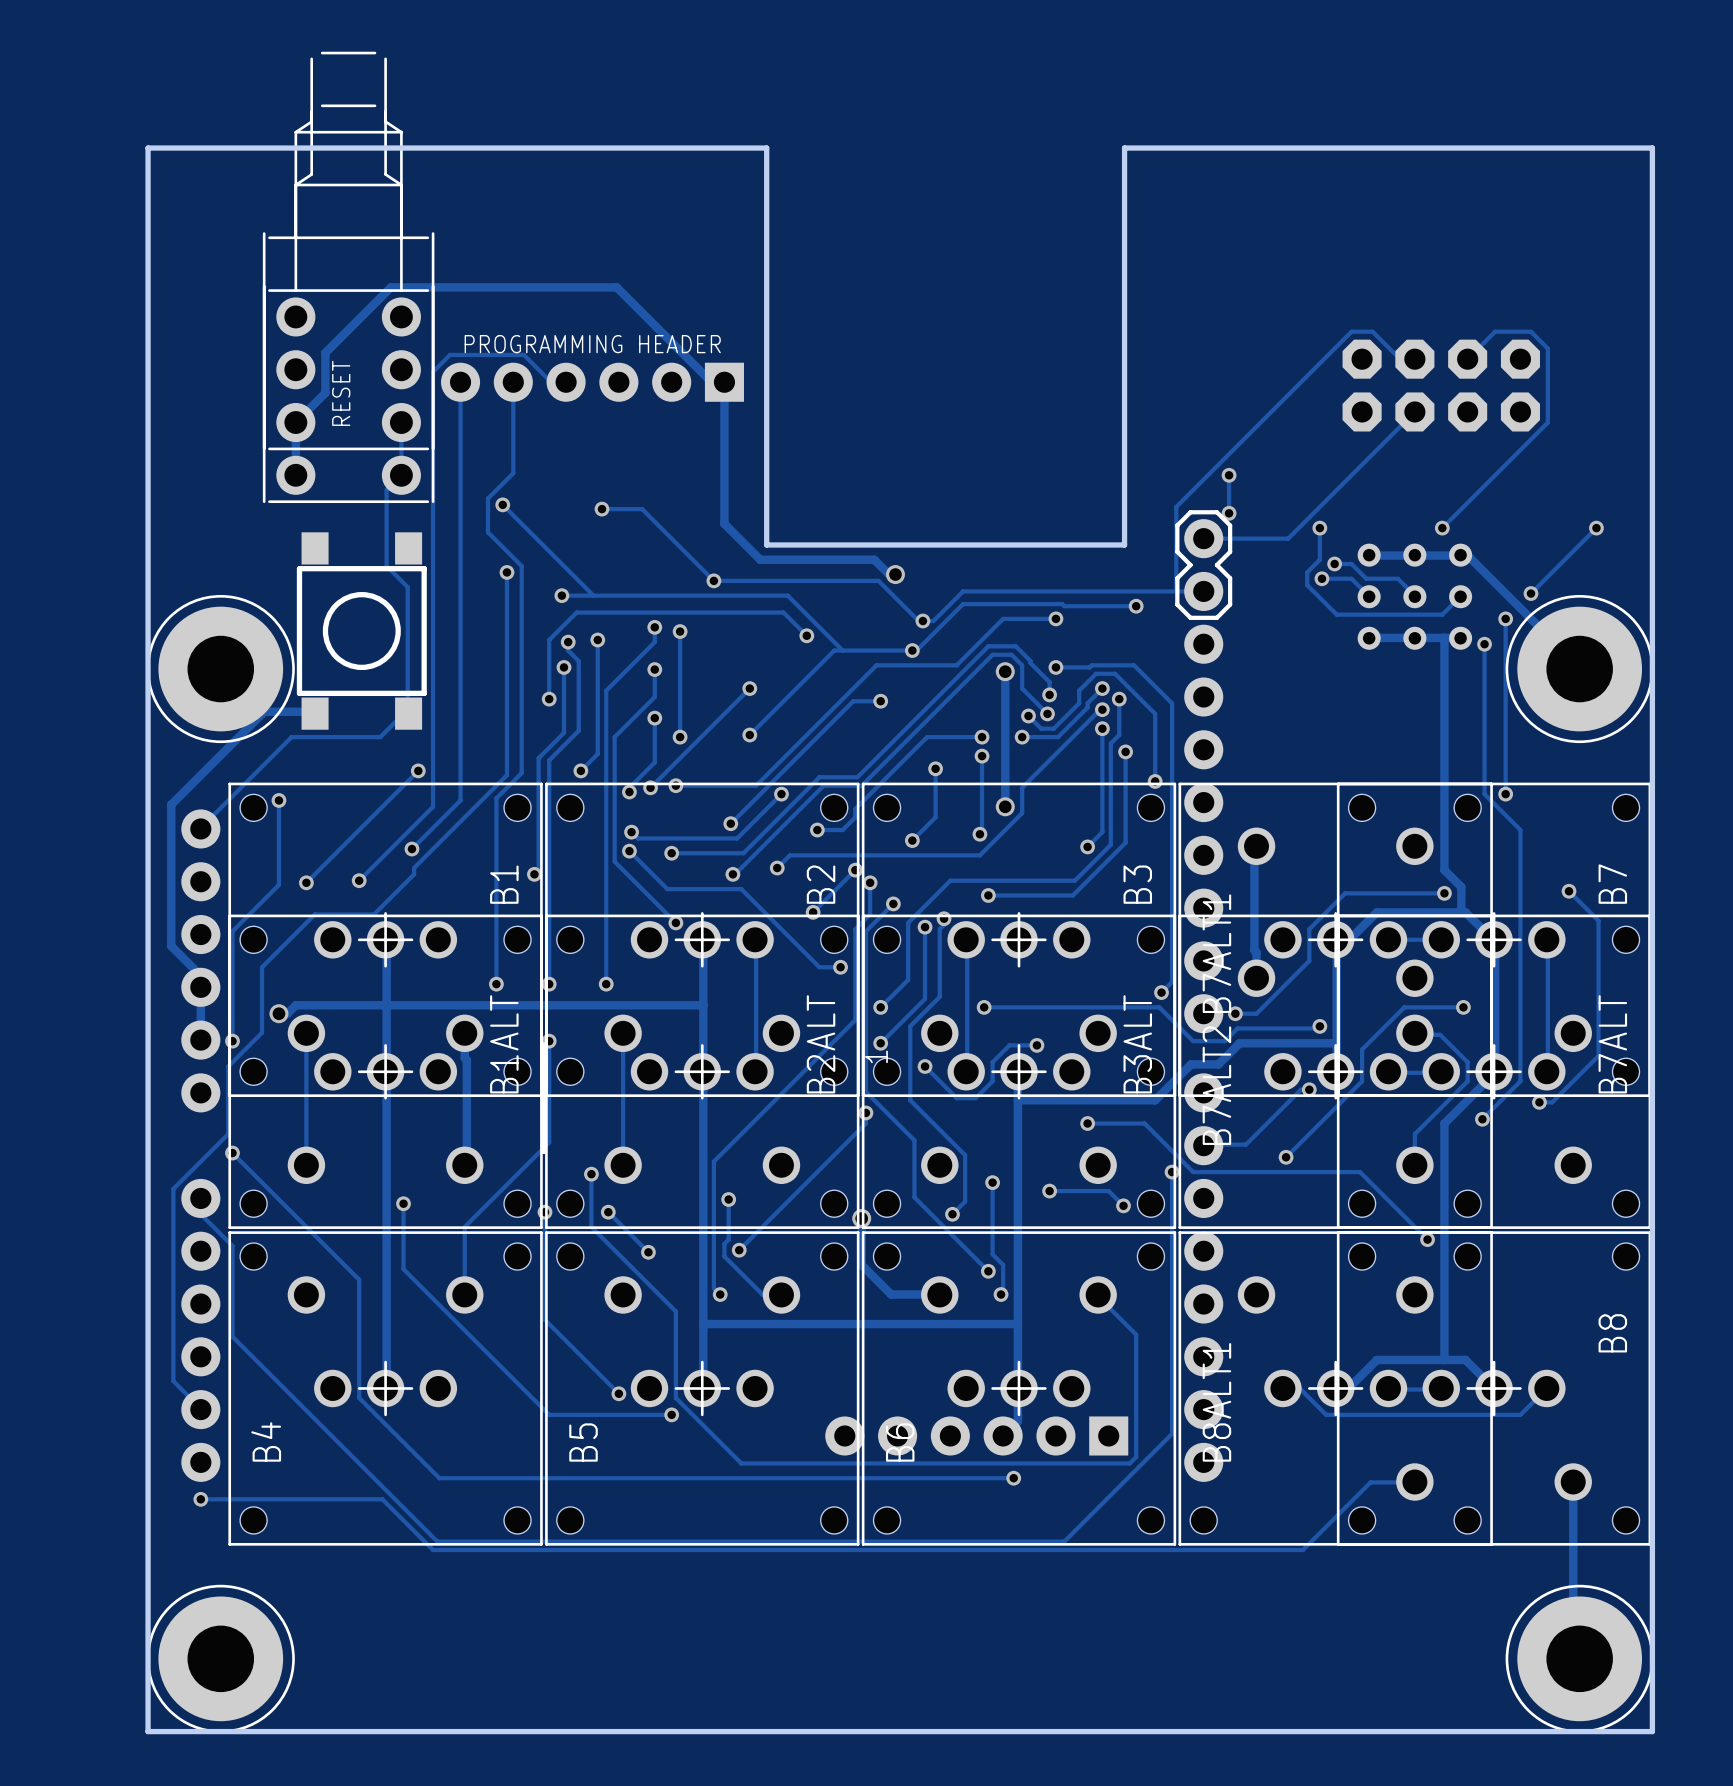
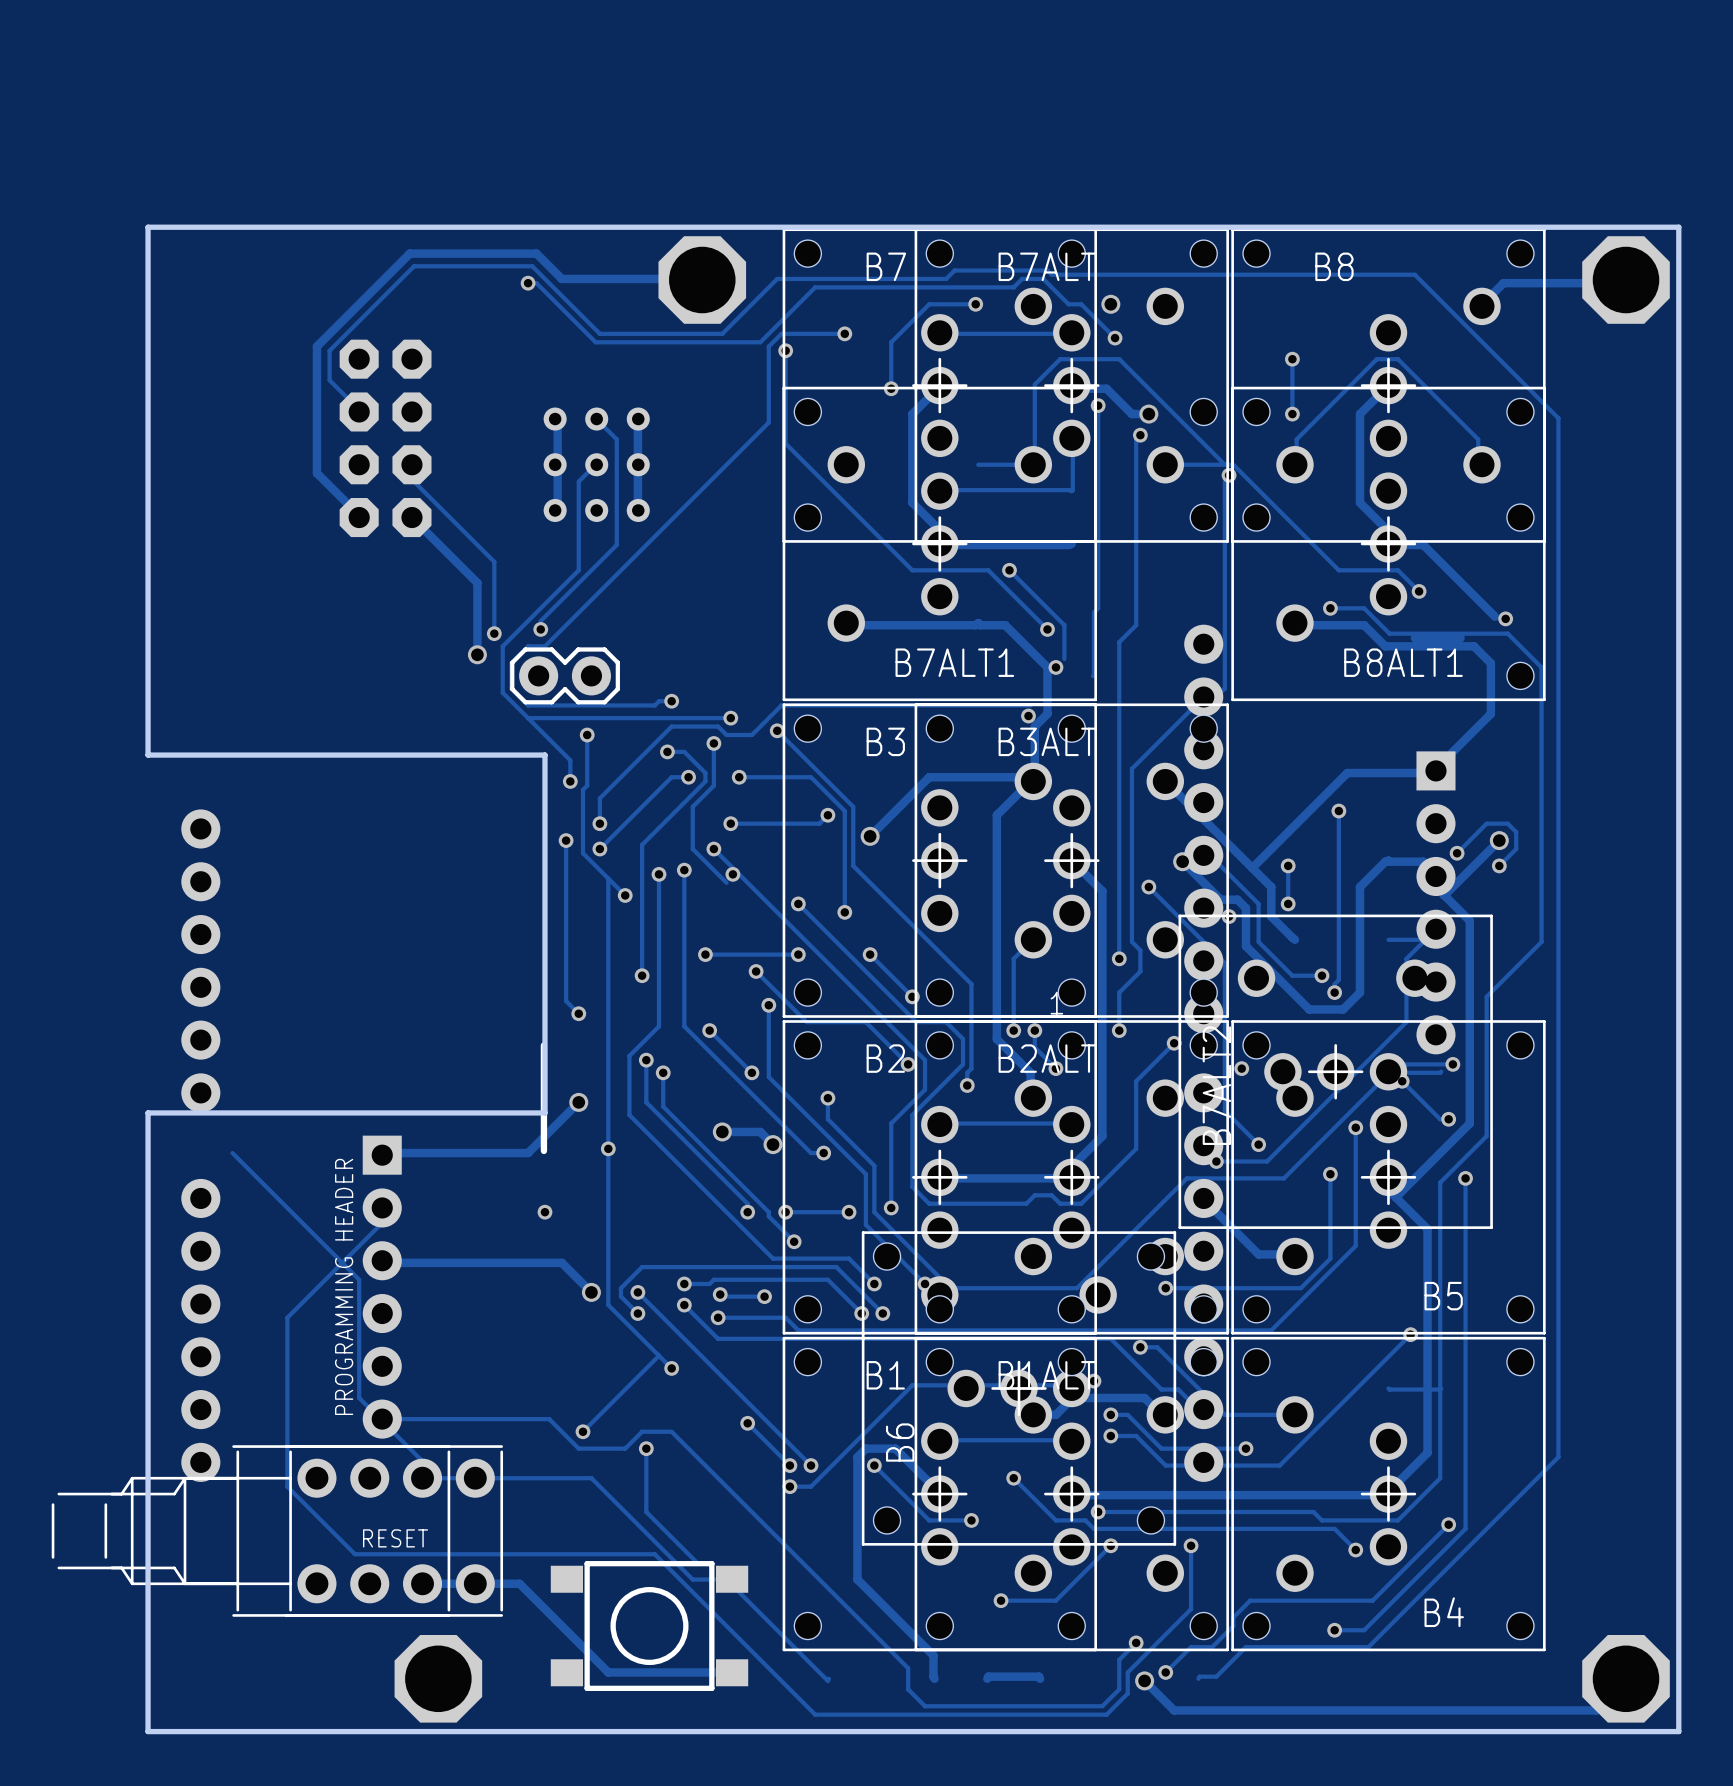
board edge: (148, 227) (148, 148) (766, 148) (766, 544) (1124, 544) (1124, 148) (1652, 148) (1652, 1731) -> (148, 227) (1678, 227) (1678, 1731) (1652, 1731)
part: (348, 250) -> none
hole: none -> (807, 253)
hole: none -> (939, 253)
hole: none -> (1071, 253)
hole: none -> (1203, 253)
track: none -> (702, 280) (561, 278) (536, 253) (409, 253) (316, 346) (316, 473) (359, 517)
part: none -> (702, 280)
track: none -> (1626, 280) (1626, 283) (1503, 283) (1482, 306)
part: none -> (1626, 280)
track: none -> (528, 283) (536, 283) (595, 342) (760, 342) (815, 287) (1013, 287) (1022, 278) (1043, 278) (1068, 304) (1081, 304) (1115, 338)
via: none -> (528, 283)
part: (348, 303) -> none
track: none -> (975, 304) (929, 304) (891, 342) (891, 388)
via: none -> (975, 304)
via: none -> (1110, 304)
track: none -> (939, 332) (1071, 332)
track: none -> (844, 333) (781, 333) (768, 346) (768, 422) (544, 646) (528, 646) (511, 663) (511, 688) (528, 705) (654, 705) (659, 701) (671, 701)
via: none -> (844, 333)
via: none -> (1115, 338)
text: PROGRAMMING HEADER (592, 344) -> none
track: none -> (785, 350) (785, 443) (912, 570) (988, 570) (1047, 629)
via: none -> (785, 350)
track: none -> (1292, 359) (1292, 414)
via: none -> (1292, 359)
track: (1414, 359) (1400, 359) (1372, 331) (1351, 331) (1176, 506) (1176, 591) -> none
track: (1467, 359) (1495, 331) (1531, 331) (1547, 348) (1547, 422) (1442, 528) -> none
track: (460, 382) (460, 800) (411, 849) -> none
track: (513, 382) (513, 473) (487, 498) (487, 532) (521, 566) (521, 773) (496, 798) (496, 984) -> none
track: (566, 382) (566, 380) (549, 380) (523, 354) (449, 354) (433, 371) (433, 806) (359, 880) -> none
part: (592, 382) -> none
track: none -> (939, 385) (912, 414) (912, 502) (937, 528) (937, 540) (939, 543) (1071, 543)
track: none -> (1071, 385) (1072, 388) (1106, 388) (1131, 414) (1148, 414)
track: none -> (1388, 385) (1359, 414) (1359, 502) (1385, 528) (1385, 540) (1389, 544) (1423, 544) (1495, 616)
part: (1441, 385) -> none
via: none -> (891, 388)
text: RESET (341, 393) -> none
track: none -> (1098, 405) (1098, 608) (1093, 612) (1092, 675)
via: none -> (1098, 405)
track: none -> (359, 411) (329, 380) (329, 350) (414, 266) (532, 266) (599, 333) (722, 333) (777, 278) (946, 278) (954, 270) (1047, 270) (1051, 274) (1414, 274) (1558, 418) (1558, 1457) (1368, 1647) (1245, 1647) (1216, 1676) (1199, 1676) (1198, 1678)
hole: none -> (807, 411)
hole: none -> (1203, 411)
hole: none -> (1256, 411)
track: (1414, 411) (1288, 538) (1203, 538) -> none
hole: none -> (1520, 411)
via: none -> (1148, 414)
via: none -> (1292, 414)
track: none -> (555, 419) (557, 422) (557, 506) (555, 510)
track: none -> (596, 419) (616, 439) (616, 544) (540, 620) (540, 629)
track: none -> (638, 419) (638, 510)
track: (401, 422) (401, 475) (386, 490) (386, 566) (407, 587) (408, 713) (405, 711) (380, 737) (291, 737) (200, 828) -> none
track: none -> (1140, 435) (1136, 439) (1136, 625) (1119, 642) (1119, 699)
via: none -> (1140, 435)
part: none -> (385, 438)
track: none -> (1071, 438) (1071, 491) (939, 491)
track: none -> (411, 464) (414, 464) (414, 481) (494, 561) (494, 633)
track: none -> (596, 464) (578, 481) (578, 570) (502, 646) (502, 692) (570, 760) (570, 781)
part: none -> (596, 464)
track: none -> (978, 464) (1034, 464) (1034, 384) (1060, 359) (1119, 359) (1224, 464)
track: none -> (1165, 464) (1233, 464) (1338, 570) (1397, 570) (1419, 591)
track: none -> (1294, 464) (1296, 464) (1296, 439) (1376, 359) (1397, 359) (1478, 439) (1478, 464) (1482, 464)
track: (295, 475) (295, 422) (325, 392) (325, 352) (390, 287) (616, 287) (709, 380) (722, 380) (724, 382) (724, 523) (760, 559) (874, 559) (889, 574) (895, 574) -> none
track: (1229, 475) (1229, 513) -> (1288, 865) (1288, 903)
track: none -> (1224, 481) (1224, 688) (1207, 705) (1195, 705) (1131, 768) (1131, 941) (1140, 950) (1140, 971) (1119, 992) (1119, 1030)
track: (502, 504) (593, 595) -> none
via: (502, 504) -> none
track: (601, 509) (642, 509) (713, 580) (878, 580) (918, 620) (933, 620) (963, 591) (1203, 591) -> none
via: (601, 509) -> none
via: (1229, 513) -> none
track: none -> (411, 517) (477, 582) (477, 654)
hole: none -> (807, 517)
hole: none -> (1203, 517)
track: (1319, 528) (1319, 559) (1307, 572) (1307, 585) (1336, 614) (1442, 614) (1460, 596) -> none
via: (1319, 528) -> none
via: (1442, 528) -> none
track: (1596, 528) (1531, 593) -> none
via: (1596, 528) -> none
track: (1369, 555) (1414, 555) -> none
track: (1414, 555) (1460, 555) (1463, 557) (1469, 557) (1579, 669) -> none
track: (1334, 563) (1351, 563) (1366, 578) (1397, 578) (1414, 596) -> none
via: (1334, 563) -> none
part: (1203, 565) -> none
track: none -> (1009, 570) (1064, 625) (1064, 659)
via: none -> (1009, 570)
track: (506, 572) (506, 775) (414, 868) (414, 874) (373, 914) (314, 914) (262, 967) (262, 1032) (228, 1066) (228, 1134) (173, 1188) (173, 1381) (200, 1409) -> none
via: (506, 572) -> none
via: (895, 574) -> none
track: (1321, 578) (1351, 578) (1369, 596) -> none
via: (1321, 578) -> none
via: (713, 580) -> none
via: none -> (1419, 591)
via: (1531, 593) -> none
track: (561, 595) (787, 595) (842, 650) -> none
via: (561, 595) -> none
part: (1414, 596) -> none
track: (1136, 606) (963, 604) (916, 650) (834, 650) (749, 735) -> none
via: (1136, 606) -> none
track: none -> (1330, 608) (1364, 608) (1389, 633) (1507, 633) (1541, 667) (1541, 941) (1486, 996) (1486, 1136) (1440, 1182) (1440, 1478) (1397, 1520) (1321, 1520) (1313, 1512) (1098, 1512)
via: none -> (1330, 608)
track: (1055, 618) (1003, 618) (956, 665) (876, 665) (756, 785) (675, 785) -> none
via position: (1055, 618) -> (1047, 629)
track: (1505, 618) (1505, 794) -> none
via: (922, 620) -> none
track: none -> (846, 623) (849, 625) (975, 625) (978, 623) (979, 625) (1005, 625) (1047, 667) (1047, 713) (1034, 726) (1034, 781) (1030, 781) (996, 815) (996, 1039) (1030, 1072) (1030, 1098) (1033, 1098)
track: none -> (1294, 623) (1296, 625) (1364, 625) (1385, 646) (1473, 646) (1490, 663) (1490, 713) (1435, 768) (1435, 773) (1347, 773) (1252, 868)
track: (654, 627) (654, 642) (606, 690) (606, 984) -> none
via: (654, 627) -> none
via: none -> (540, 629)
part: (361, 631) -> none
track: (680, 631) (680, 737) -> none
via: (680, 631) -> none
via: none -> (494, 633)
track: (806, 635) (783, 612) (576, 612) (549, 640) (549, 699) -> none
via: (806, 635) -> none
track: (1414, 637) (1369, 638) -> none
track: (1444, 637) (1444, 870) (1461, 887) (1461, 912) -> none
track: (597, 640) (597, 754) (580, 770) -> none
via: (597, 640) -> none
track: (568, 642) (568, 650) (578, 661) (578, 730) (549, 760) (549, 984) -> none
via: (568, 642) -> none
track: (1484, 644) (1484, 794) (1520, 830) (1520, 1081) (1482, 1119) -> none
via: (1484, 644) -> none
via: (912, 650) -> none
via: none -> (477, 654)
track: (563, 667) (563, 732) (538, 758) (538, 870) (534, 874) -> none
via: (563, 667) -> none
track: (1055, 667) (1134, 665) (1172, 703) (1172, 982) (1161, 992) -> none
part: (220, 669) -> none
track: (654, 669) (654, 697) (614, 737) (614, 861) (675, 922) -> none
via: (654, 669) -> none
part: (1579, 669) -> none
track: (1005, 671) (1005, 806) -> none
via: (1005, 671) -> none
part: none -> (565, 675)
hole: none -> (1520, 675)
track: (749, 688) (650, 787) -> none
via: (749, 688) -> none
track: (1102, 688) (1087, 703) (1087, 707) (1058, 737) (1022, 737) -> none
via: (1102, 688) -> none
track: (1049, 694) (1049, 682) (1015, 646) (988, 646) (857, 777) (819, 777) (743, 853) (671, 853) -> none
via: (1049, 694) -> none
via: (549, 699) -> none
via: (1119, 699) -> none
via: none -> (671, 701)
track: (880, 701) (853, 701) (730, 823) -> (827, 815) (819, 823) (730, 823)
via: (880, 701) -> none
track: none -> (1030, 705) (781, 705) (751, 735) (726, 735) (718, 726) (671, 726) (599, 798) (599, 823)
track: (1102, 709) (1022, 787) (1022, 813) (979, 855) (789, 855) (777, 868) -> none
via: (1102, 709) -> none
track: (315, 713) (314, 711) (264, 711) (220, 669) (262, 713) (171, 804) (171, 946) (198, 973) (198, 984) (200, 987) (200, 1040) -> none
track: (1047, 713) (1022, 688) (1022, 665) (1011, 654) (992, 654) (861, 785) (823, 785) (732, 874) -> none
via: (1047, 713) -> none
track: (1028, 716) (1041, 728) (1053, 728) (1079, 703) (1079, 690) (1096, 673) (1115, 673) (1155, 713) (1155, 781) -> none
track: none -> (528, 718) (730, 718)
track: (654, 718) (654, 762) (629, 787) (629, 792) -> none
via: (654, 718) -> none
via: none -> (730, 718)
track: (1102, 728) (1102, 832) (1087, 846) -> none
via: (1102, 728) -> none
track: none -> (777, 730) (853, 806) (853, 865) (971, 984) (971, 1068) (967, 1072) (967, 1085)
via: none -> (777, 730)
track: none -> (587, 735) (587, 785) (582, 789) (582, 853) (625, 895)
via: none -> (587, 735)
via: (749, 735) -> none
track: (1119, 735) (1110, 743) (1110, 844) (1074, 880) (950, 880) (908, 922) (908, 979) (880, 1007) -> (1119, 735) (1119, 958)
via position: (680, 737) -> (667, 751)
track: (982, 737) (927, 737) (855, 808) (855, 817) (842, 830) (817, 830) -> none
via: (982, 737) -> none
via: (1022, 737) -> none
track: none -> (713, 743) (713, 785) (692, 806) (692, 849) (726, 882)
via: none -> (713, 743)
track: none -> (667, 751) (684, 751) (705, 773) (705, 781) (642, 844) (642, 975)
track: (1125, 751) (1125, 842) (1072, 895) (988, 895) -> none
via: (1125, 751) -> none
board edge: (148, 755) (148, 1112) -> (148, 755) (544, 755) (544, 1112) (148, 1112)
track: (982, 756) (982, 832) (979, 834) -> none
via: (982, 756) -> none
track: (935, 768) (935, 817) (912, 840) -> none
via: (935, 768) -> none
track: (418, 770) (306, 882) -> none
via: (418, 770) -> none
via position: (580, 770) -> (570, 781)
track: none -> (688, 777) (671, 777) (599, 849)
track: none -> (739, 777) (811, 777) (844, 811) (844, 912)
via: none -> (739, 777)
track: none -> (1033, 781) (1034, 777) (929, 777) (870, 836)
via: (1155, 781) -> none
track: none -> (1165, 781) (1271, 887) (1271, 916) (1294, 939)
via position: (675, 785) -> (688, 777)
via: (650, 787) -> none
via: (629, 792) -> none
track: (781, 794) (737, 838) (637, 838) (631, 832) -> none
via: (781, 794) -> none
via: (1505, 794) -> none
track: (278, 800) (278, 884) (232, 931) (232, 1041) -> none
via: (278, 800) -> none
via: (1005, 806) -> none
hole: (1362, 807) -> none
hole: (1467, 807) -> none
hole: (1626, 807) -> none
track: none -> (1338, 811) (1338, 979) (1334, 984) (1334, 992)
via: none -> (1338, 811)
via: none -> (599, 823)
via position: (817, 830) -> (827, 815)
via: (631, 832) -> none
via: (979, 834) -> none
via: none -> (870, 836)
track: none -> (566, 840) (566, 1001) (578, 1013)
via: none -> (566, 840)
via: (912, 840) -> none
track: none -> (1499, 840) (1444, 895) (1435, 876)
via: none -> (1499, 840)
via: (1087, 846) -> none
track: (1256, 846) (1254, 849) (1254, 950) (1256, 952) (1256, 978) -> none
via: (411, 849) -> none
via: none -> (599, 849)
track: none -> (713, 849) (925, 1060) (925, 1089) (891, 1123) (891, 1207)
via: none -> (713, 849)
track: (629, 851) (667, 889) (741, 889) (819, 967) (840, 967) -> none
via: (629, 851) -> none
via: (671, 853) -> none
track: none -> (1457, 853) (1486, 823) (1507, 823) (1516, 832) (1516, 849) (1499, 865)
via: none -> (1457, 853)
track: none -> (1071, 860) (1102, 891) (1102, 1136) (1072, 1165) (1071, 1177) (1068, 1178) (939, 1177)
track: none -> (1182, 861) (1220, 899) (1237, 899) (1245, 908) (1245, 946) (1309, 1009) (1343, 1009) (1359, 992) (1359, 887) (1385, 861) (1423, 861) (1435, 874) (1435, 887) (1469, 920) (1469, 1123) (1395, 1197)
via: none -> (1182, 861)
track: none -> (1212, 865) (1220, 865) (1258, 903) (1258, 941) (1292, 975) (1321, 975)
via: none -> (1288, 865)
via: none -> (1499, 865)
via: (777, 868) -> none
track: none -> (684, 870) (684, 1026) (811, 1153) (823, 1153)
via: none -> (684, 870)
track: (855, 870) (813, 912) -> none
via: (855, 870) -> none
via: (534, 874) -> none
track: none -> (659, 874) (659, 1026) (629, 1055) (629, 1115) (773, 1258) (849, 1258) (874, 1283)
via: none -> (659, 874)
track: none -> (608, 878) (608, 1305) (671, 1368)
via: (359, 880) -> none
via: (306, 882) -> none
track: (870, 882) (870, 914) (855, 929) (855, 1020) (713, 1161) (713, 1288) (720, 1294) -> none
via: (870, 882) -> none
track: none -> (1148, 887) (1224, 963) (1224, 1110) (1258, 1144)
via: none -> (1148, 887)
track: (1569, 891) (1598, 920) (1598, 1055) (1552, 1102) (1539, 1102) -> none
via: (1569, 891) -> none
track: (1444, 893) (1345, 893) (1309, 929) (1309, 960) (1256, 1013) (1235, 1013) -> none
via: (1444, 893) -> none
via: none -> (625, 895)
via: (988, 895) -> none
part: none -> (1435, 902)
track: none -> (798, 903) (916, 1022) (946, 1022) (963, 1039) (963, 1064) (912, 1115) (912, 1186) (929, 1203) (1026, 1203) (1034, 1195) (1051, 1195) (1060, 1203) (1081, 1203) (1136, 1148) (1136, 1081) (1174, 1043)
track: (893, 903) (865, 931) (865, 1091) (914, 1140) (914, 1197) (988, 1271) -> none
via: (893, 903) -> none
via: none -> (1288, 903)
via position: (813, 912) -> (798, 903)
via: none -> (844, 912)
via: none -> (1229, 916)
track: (944, 918) (944, 925) (939, 929) (939, 996) (910, 1026) (910, 1100) (965, 1155) (965, 1201) (952, 1214) -> none
via: (944, 918) -> none
via: (675, 922) -> none
track: (925, 927) (925, 998) (880, 1043) -> none
via: (925, 927) -> none
track: none -> (1435, 929) (1406, 958) (1406, 1022) (1267, 1161) (1216, 1161)
track: (385, 939) (385, 1388) -> none
B1 rotation: 0° (385, 939) -> 90° counterclockwise (939, 1494)
B1 position: (385, 939) -> (939, 1494)
track: (702, 939) (702, 1388) -> none
B2 rotation: 0° (702, 939) -> 90° counterclockwise (939, 1177)
B2 position: (702, 939) -> (939, 1177)
track: (755, 939) (755, 1071) -> none
track: (966, 939) (966, 1071) -> none
B3 rotation: 0° (1018, 939) -> 90° counterclockwise (939, 860)
track: none -> (1033, 939) (1013, 958) (1013, 1030)
B7ALT1 rotation: 0° (1335, 939) -> 90° counterclockwise (939, 543)
B7ALT1 position: (1335, 939) -> (939, 543)
B7 rotation: 0° (1494, 939) -> 90° counterclockwise (939, 385)
B7 position: (1494, 939) -> (939, 385)
track: (1546, 939) (1546, 1071) -> none
hole: (1626, 939) -> none
track: none -> (705, 954) (798, 954)
via: none -> (705, 954)
via: none -> (798, 954)
track: none -> (870, 954) (912, 996)
via: none -> (870, 954)
via: none -> (1119, 958)
via: (840, 967) -> none
track: none -> (756, 971) (806, 1022) (865, 1022) (908, 1064)
via: none -> (756, 971)
via: none -> (642, 975)
via: none -> (1321, 975)
via: (496, 984) -> none
via: (549, 984) -> none
via: (606, 984) -> none
via: (1161, 992) -> none
via: none -> (1334, 992)
via: none -> (912, 996)
track: (703, 1005) (295, 1005) (287, 1013) (278, 1013) -> none
track: none -> (768, 1005) (768, 1077) (865, 1174) (865, 1224) (925, 1283)
via: none -> (768, 1005)
via: (880, 1007) -> none
track: (984, 1007) (1159, 1007) (1193, 1041) (1224, 1041) (1237, 1028) (1317, 1028) (1319, 1026) -> none
via: (984, 1007) -> none
track: (1463, 1007) (1404, 1007) (1362, 1049) (1362, 1081) (1286, 1157) -> none
via: (1463, 1007) -> none
via: (278, 1013) -> none
via: none -> (578, 1013)
via: (1235, 1013) -> none
via: (1319, 1026) -> none
track: none -> (709, 1030) (751, 1072)
via: none -> (709, 1030)
via: none -> (1013, 1030)
track: none -> (1034, 1030) (1034, 1047) (1055, 1068)
via: none -> (1119, 1030)
track: (306, 1033) (306, 1165) -> none
track: (464, 1033) (464, 1058) (466, 1060) (466, 1161) (464, 1165) -> none
track: (623, 1033) (623, 1165) -> none
track: (1414, 1033) (1440, 1034) (1467, 1062) (1467, 1081) (1414, 1134) (1414, 1165) -> none
via: (232, 1041) -> none
track: (549, 1041) (549, 1142) (464, 1226) (464, 1294) -> none
via: (549, 1041) -> none
via: (880, 1043) -> none
via: none -> (1174, 1043)
track: (1336, 1043) (1239, 1043) (1218, 1064) (1191, 1064) (1155, 1100) (1017, 1100) -> none
track: (1036, 1045) (1009, 1045) (992, 1062) (992, 1081) (975, 1098) (956, 1098) (925, 1066) -> none
via position: (1036, 1045) -> (1034, 1030)
text rotation: 0° (876, 1056) -> 90° clockwise (1056, 1003)
text position: 1 (876, 1056) -> 1 (1056, 1003)
track: none -> (646, 1060) (646, 1102) (747, 1203) (747, 1212)
via: none -> (646, 1060)
track: none -> (1452, 1064) (1397, 1064) (1283, 1178) (1186, 1178) (1077, 1288) (950, 1288) (874, 1212) (874, 1165) (827, 1119) (827, 1098)
via: none -> (1452, 1064)
via position: (925, 1066) -> (908, 1064)
via: none -> (1055, 1068)
via: none -> (1241, 1068)
B1ALT rotation: 0° (385, 1071) -> 90° counterclockwise (1071, 1494)
B1ALT position: (385, 1071) -> (1071, 1494)
B2ALT rotation: 0° (702, 1071) -> 90° counterclockwise (1071, 1177)
B2ALT position: (702, 1071) -> (1071, 1177)
track: (1018, 1071) (1017, 1421) (1003, 1435) -> none
B3ALT rotation: 0° (1018, 1071) -> 90° counterclockwise (1071, 860)
B3ALT position: (1018, 1071) -> (1071, 860)
track: (1335, 1071) (1335, 939) (1338, 937) (1351, 937) (1376, 912) (1465, 912) (1495, 939) (1495, 1070) (1444, 1123) (1444, 1359) -> none
B7ALT rotation: 0° (1494, 1071) -> 90° counterclockwise (1071, 385)
B7ALT position: (1494, 1071) -> (1071, 385)
hole: (1626, 1071) -> none
track: none -> (663, 1072) (663, 1106) (768, 1212) (768, 1216) (794, 1241)
via: none -> (663, 1072)
via: none -> (751, 1072)
track: none -> (1402, 1081) (1440, 1119) (1448, 1119)
via: none -> (1402, 1081)
via: none -> (967, 1085)
track: (1309, 1089) (1300, 1089) (1245, 1144) (1203, 1145) -> none
via: (1309, 1089) -> none
via: none -> (827, 1098)
track: none -> (578, 1102) (528, 1153) (384, 1153) (382, 1155)
via: none -> (578, 1102)
via: (1539, 1102) -> none
track: (865, 1112) (865, 1123) (739, 1250) -> none
via: (865, 1112) -> none
via: none -> (1448, 1119)
via: (1482, 1119) -> none
track: (1087, 1123) (1144, 1123) (1193, 1172) (1359, 1172) (1427, 1239) -> none
via: (1087, 1123) -> none
track: none -> (939, 1124) (1071, 1124)
track: none -> (1355, 1127) (1355, 1245) (1271, 1330) (798, 1330) (785, 1317) (718, 1317)
via: none -> (1355, 1127)
track: none -> (722, 1131) (760, 1131) (773, 1144)
via: none -> (722, 1131)
via: none -> (773, 1144)
via: none -> (1258, 1144)
via: (232, 1153) -> none
via: none -> (823, 1153)
via: (1286, 1157) -> none
via: none -> (1216, 1161)
track: (1172, 1172) (1172, 1433) (1064, 1541) (437, 1541) (232, 1336) (232, 1245) (200, 1214) (200, 1198) -> none
via: (1172, 1172) -> none
track: (591, 1174) (591, 1226) (675, 1311) (675, 1397) (741, 1463) (1129, 1463) (1136, 1457) (1136, 1334) (1098, 1294) -> none
via position: (591, 1174) -> (608, 1148)
track: none -> (1330, 1174) (1330, 1258) (1300, 1288) (1165, 1288)
via: none -> (1330, 1174)
track: none -> (1388, 1177) (1389, 1191) (1427, 1229) (1427, 1452) (1388, 1494) (1071, 1494)
track: none -> (1465, 1178) (1465, 1528) (1364, 1630) (1334, 1630)
via: none -> (1465, 1178)
track: (992, 1182) (992, 1254) (1003, 1264) (1003, 1292) (1001, 1294) -> none
via: (992, 1182) -> none
track: (1049, 1191) (1108, 1191) (1123, 1205) -> none
via: (1049, 1191) -> none
track: none -> (1199, 1195) (1258, 1254) (1292, 1254) (1294, 1256)
track: (728, 1199) (728, 1239) (724, 1243) (724, 1256) (762, 1294) (781, 1294) -> none
via: (728, 1199) -> none
track: (403, 1203) (403, 1269) (549, 1414) (671, 1414) -> none
via: (403, 1203) -> none
hole: (1362, 1203) -> none
hole: (1467, 1203) -> none
hole: (1626, 1203) -> none
via: (1123, 1205) -> none
track: none -> (382, 1207) (380, 1207) (380, 1224) (287, 1317) (287, 1486) (354, 1554) (654, 1554) (815, 1714) (1106, 1714) (1127, 1693) (1127, 1672) (1191, 1609) (1191, 1545)
via: none -> (891, 1207)
track: (544, 1212) (544, 1319) (618, 1393) -> none
track: (608, 1212) (648, 1252) -> none
via: (608, 1212) -> none
via: none -> (747, 1212)
track: none -> (785, 1212) (849, 1212)
via: none -> (785, 1212)
via: (952, 1214) -> none
track: (861, 1218) (861, 1264) (891, 1294) (939, 1294) -> none
via position: (861, 1218) -> (849, 1212)
via: (1427, 1239) -> none
via: none -> (794, 1241)
via: (739, 1250) -> none
via: (648, 1252) -> none
hole: (1467, 1256) -> none
track: none -> (382, 1260) (384, 1262) (561, 1262) (591, 1292)
via: (988, 1271) -> none
track: none -> (684, 1283) (709, 1283) (713, 1279) (827, 1279) (861, 1313)
via: none -> (684, 1283)
via: none -> (874, 1283)
via: none -> (925, 1283)
text: none -> PROGRAMMING HEADER (344, 1286)
part: none -> (382, 1287)
via: none -> (1165, 1288)
via: none -> (591, 1292)
track: none -> (637, 1292) (811, 1465)
via: none -> (637, 1292)
via: (1001, 1294) -> none
track: none -> (718, 1296) (764, 1296)
via: none -> (764, 1296)
track: none -> (684, 1305) (718, 1338) (1110, 1338) (1161, 1389) (1178, 1389) (1207, 1419)
via: none -> (684, 1305)
track: none -> (637, 1313) (620, 1296) (620, 1288) (642, 1267) (836, 1267) (882, 1313)
via: none -> (637, 1313)
via: none -> (861, 1313)
via: none -> (882, 1313)
via: none -> (718, 1317)
track: (703, 1324) (1017, 1324) -> none
track: none -> (1410, 1334) (1279, 1465) (1165, 1465) (1136, 1435) (1110, 1435)
via: none -> (1410, 1334)
track: none -> (1140, 1347) (1157, 1347) (1224, 1414) (1294, 1414)
via: none -> (1140, 1347)
track: none -> (659, 1355) (582, 1431)
via: none -> (671, 1368)
track: none -> (1093, 1381) (1089, 1385) (912, 1385) (811, 1486) (789, 1486)
via: none -> (1093, 1381)
B4 rotation: 0° (385, 1388) -> 90° counterclockwise (1388, 1494)
B4 position: (385, 1388) -> (1388, 1494)
B5 rotation: 0° (702, 1388) -> 90° counterclockwise (1388, 1177)
B5 position: (702, 1388) -> (1388, 1177)
track: (1282, 1388) (1300, 1389) (1326, 1414) (1520, 1414) (1546, 1388) -> none
track: (1335, 1388) (1349, 1387) (1376, 1359) (1465, 1359) (1494, 1388) -> none
B8ALT1 rotation: 0° (1335, 1388) -> 90° counterclockwise (1388, 543)
B8ALT1 position: (1335, 1388) -> (1388, 543)
B8 rotation: 0° (1494, 1388) -> 90° counterclockwise (1388, 385)
B8 position: (1494, 1388) -> (1388, 385)
via: (618, 1393) -> none
via: (671, 1414) -> none
track: none -> (1033, 1414) (1055, 1414) (1072, 1397) (1144, 1397) (1161, 1414) (1165, 1414)
track: none -> (1110, 1414) (1127, 1414) (1161, 1448) (1245, 1448)
via: none -> (1110, 1414)
track: none -> (382, 1419) (549, 1419) (578, 1448) (625, 1448) (642, 1431) (671, 1431) (908, 1668) (908, 1689) (925, 1706) (1102, 1706) (1119, 1689) (1119, 1659) (1136, 1642)
track: none -> (747, 1423) (789, 1465)
via: none -> (747, 1423)
via: none -> (582, 1431)
part: (976, 1435) -> none
via: none -> (1110, 1435)
track: none -> (939, 1441) (1071, 1441)
track: none -> (646, 1448) (646, 1512) (697, 1562)
via: none -> (646, 1448)
via: none -> (1245, 1448)
via: none -> (789, 1465)
via: none -> (811, 1465)
track: none -> (874, 1465) (929, 1520) (971, 1520)
via: none -> (874, 1465)
track: (591, 1478) (1013, 1478) -> (591, 1478) (692, 1579) (735, 1579) (735, 1588) (827, 1680) (828, 1678)
track: none -> (1013, 1478) (1055, 1520) (1085, 1520) (1093, 1528) (1334, 1528) (1355, 1550)
track: (1414, 1482) (1370, 1482) (1302, 1550) (433, 1550) (382, 1499) (200, 1499) -> none
track: (1573, 1482) (1573, 1651) (1579, 1658) -> none
via: none -> (789, 1486)
track: none -> (939, 1494) (895, 1448) (865, 1448) (857, 1457) (857, 1579) (933, 1655) (934, 1678)
via: (200, 1499) -> none
via: none -> (1098, 1512)
via: none -> (971, 1520)
hole: (1203, 1520) -> none
hole: (1467, 1520) -> none
track: none -> (1448, 1524) (1372, 1600) (1250, 1600) (1233, 1617) (1233, 1626) (1212, 1647) (1191, 1647) (1165, 1672)
via: none -> (1448, 1524)
part: none -> (250, 1531)
part: none -> (303, 1531)
text: none -> RESET (395, 1538)
track: none -> (1110, 1545) (1055, 1600) (1001, 1600)
via: none -> (1110, 1545)
via: none -> (1191, 1545)
via: none -> (1355, 1550)
track: none -> (422, 1583) (519, 1583) (608, 1672) (732, 1672)
via: none -> (1001, 1600)
part: none -> (649, 1626)
via: none -> (1334, 1630)
via: none -> (1136, 1642)
part: (220, 1658) -> none
part: (1579, 1658) -> none
via: none -> (1165, 1672)
part: none -> (438, 1678)
track: none -> (987, 1678) (988, 1676) (1039, 1676) (1040, 1678)
track: none -> (1626, 1678) (1596, 1710) (1174, 1710) (1144, 1680)
part: none -> (1626, 1678)
via: none -> (1144, 1680)

